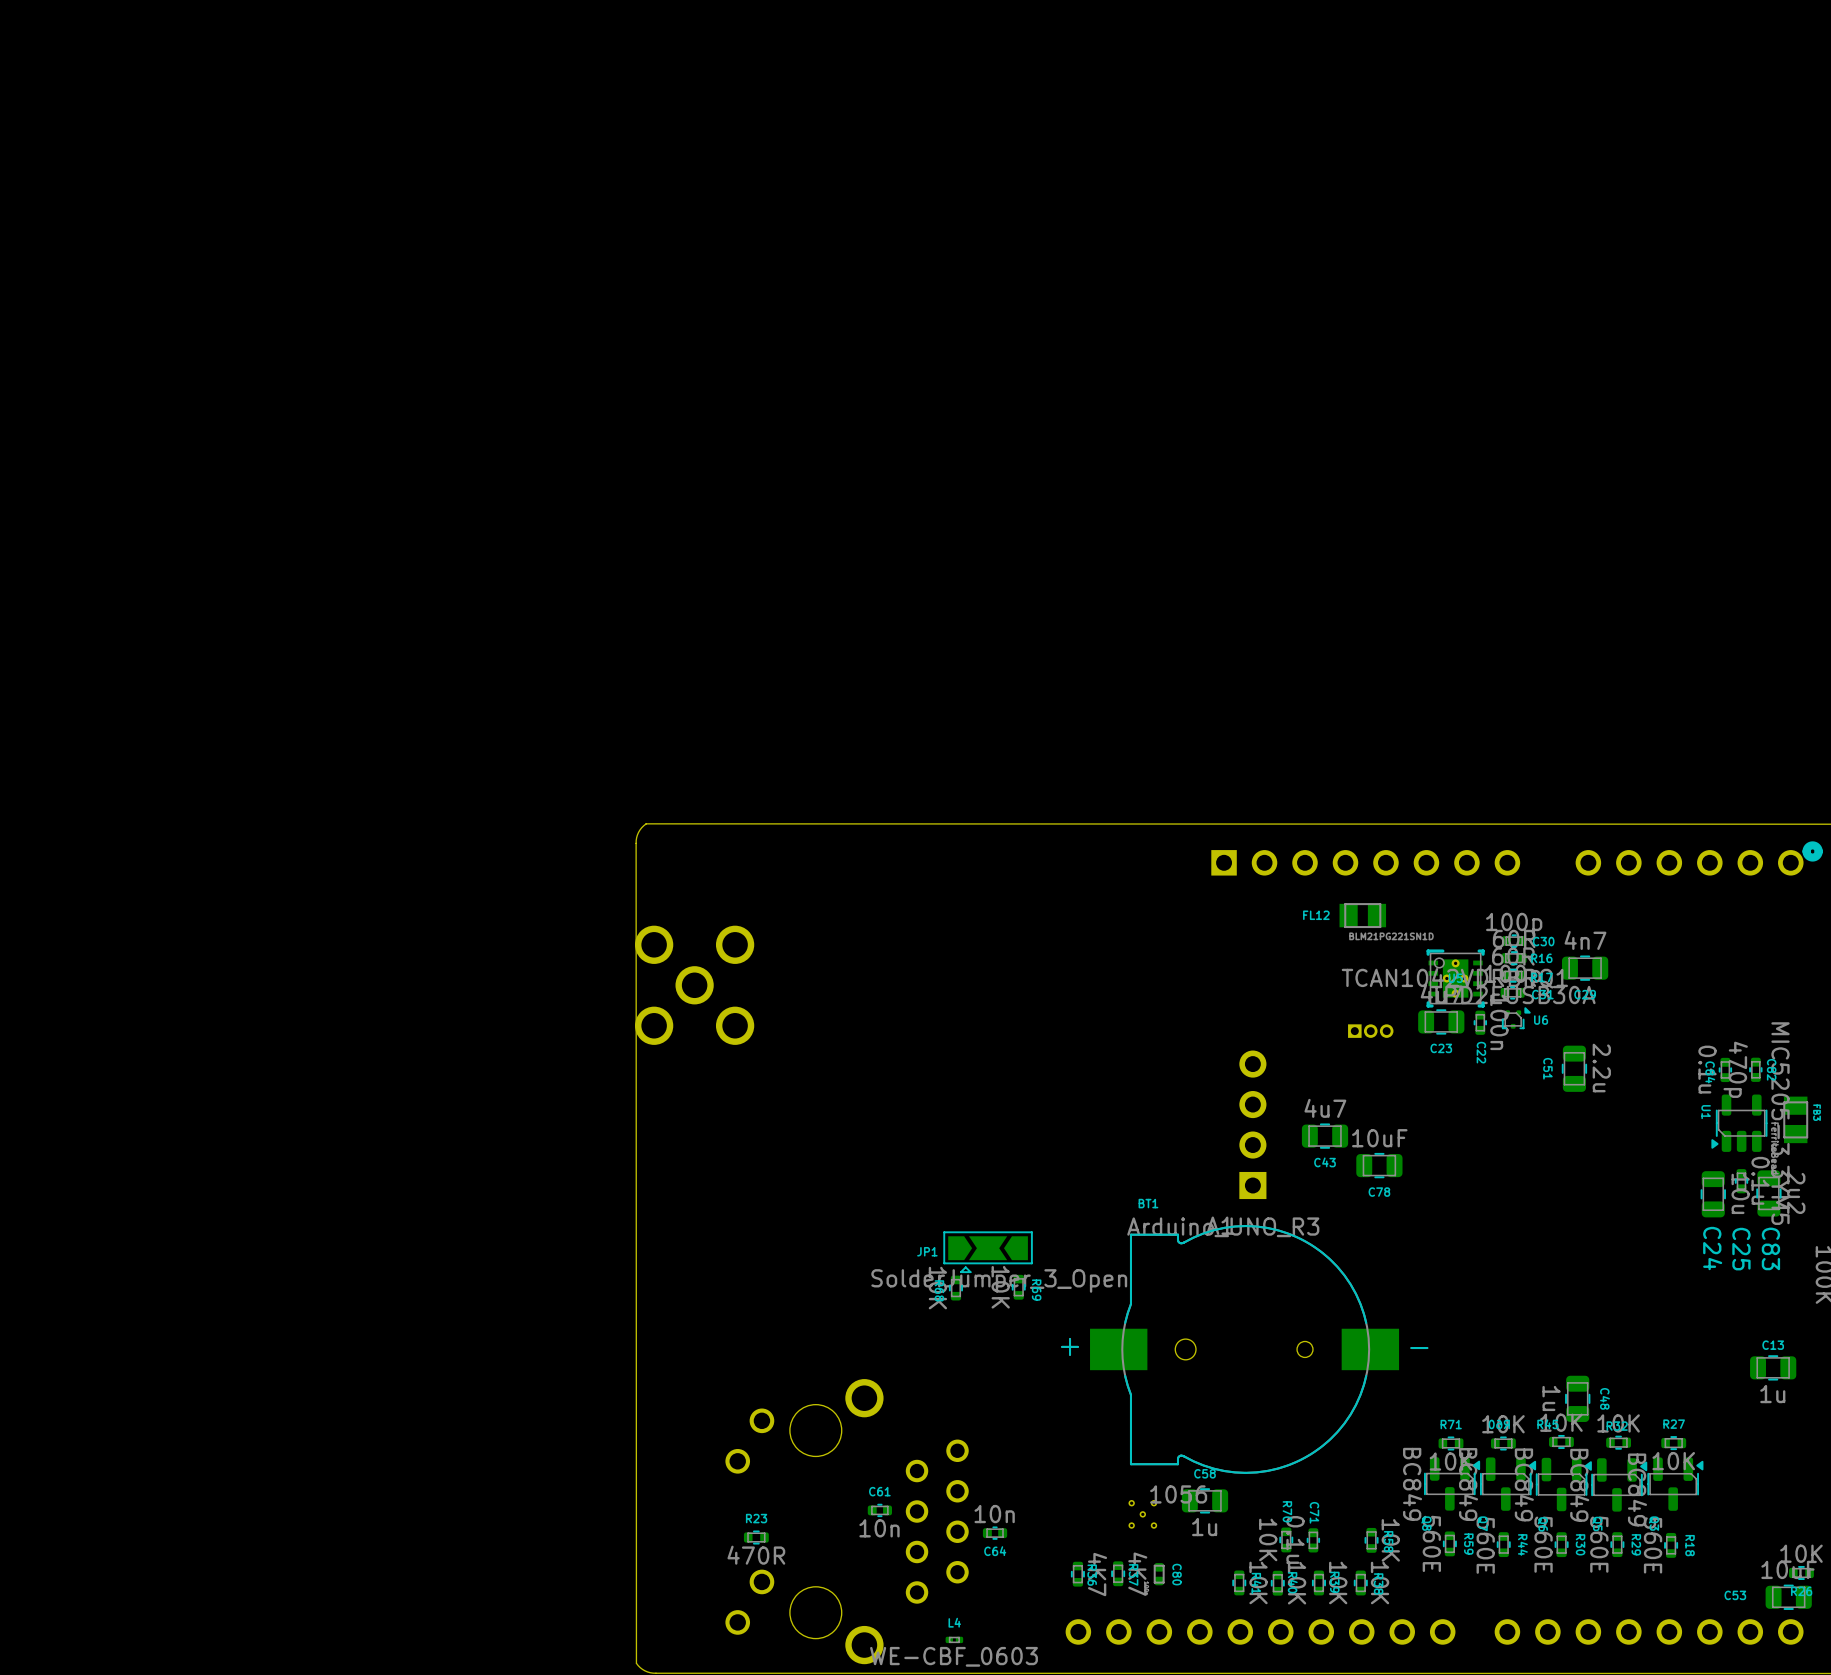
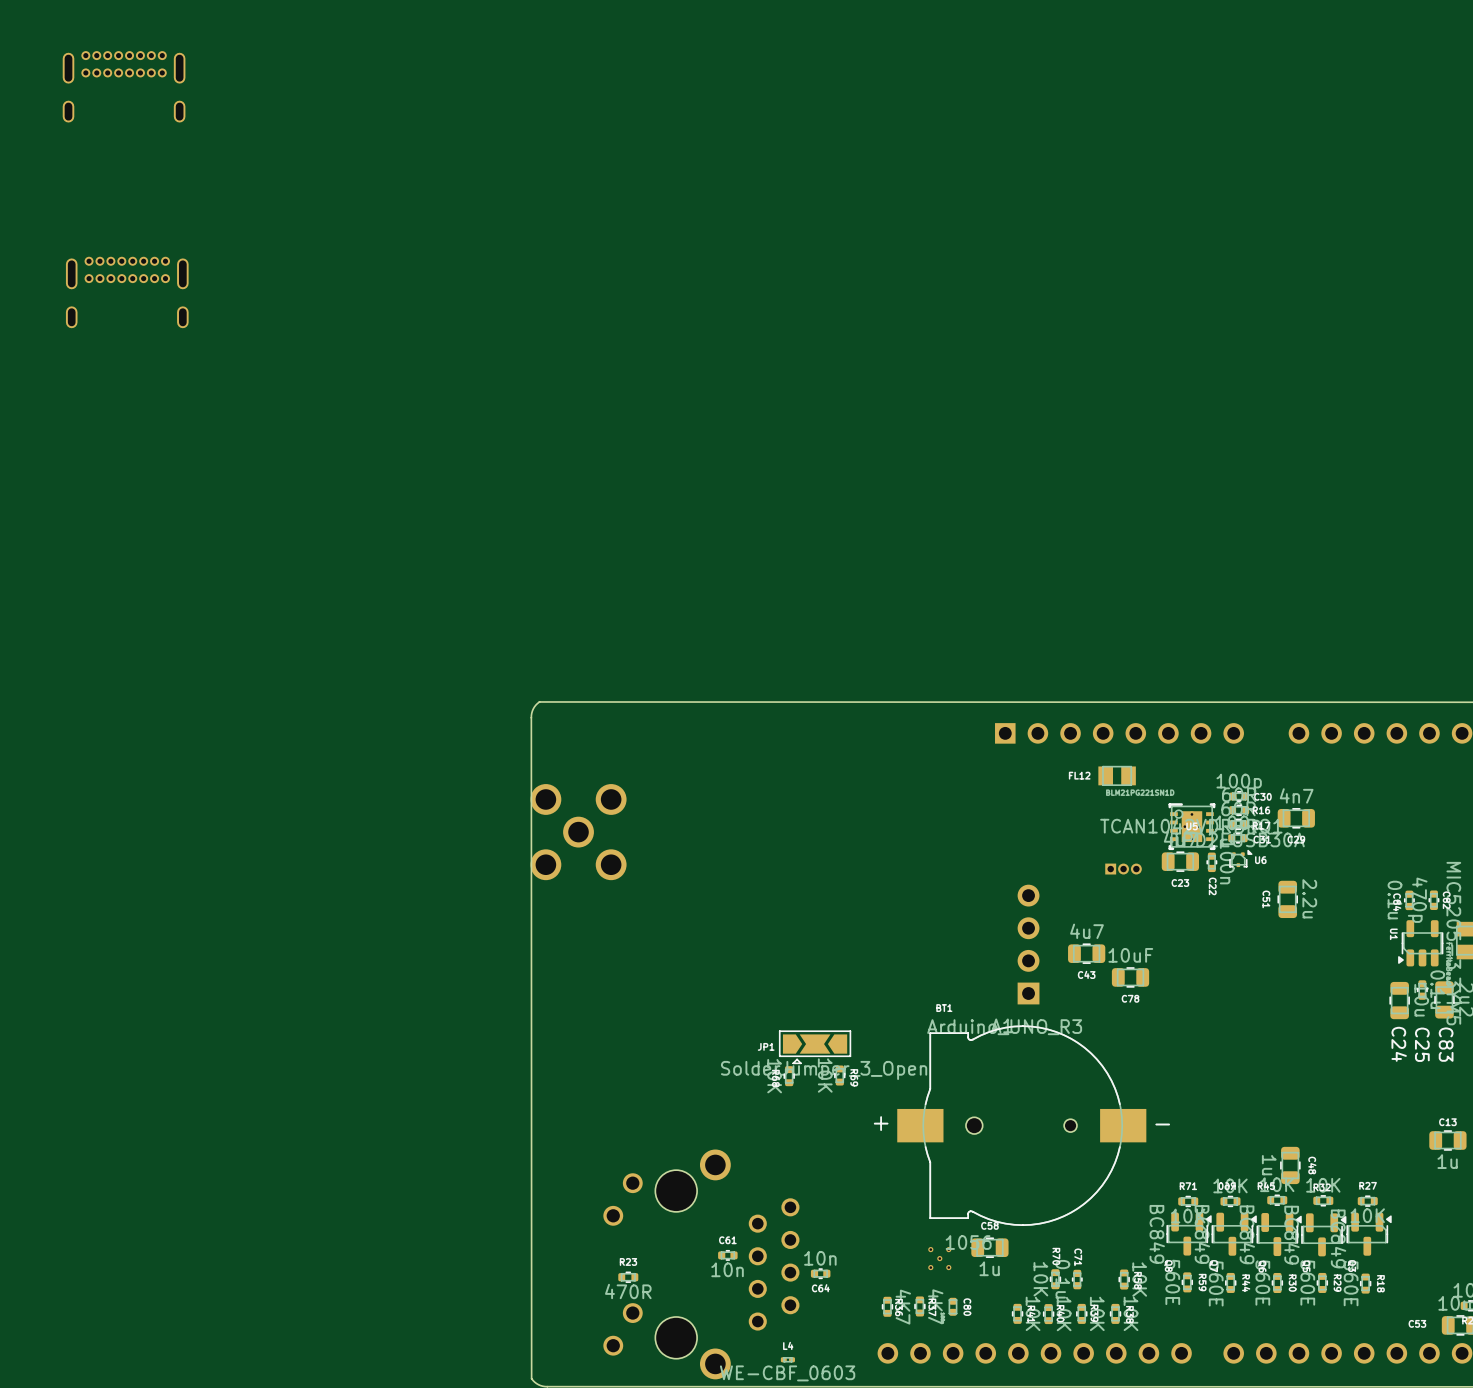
part: none -> (124, 86)
part: none -> (127, 292)

